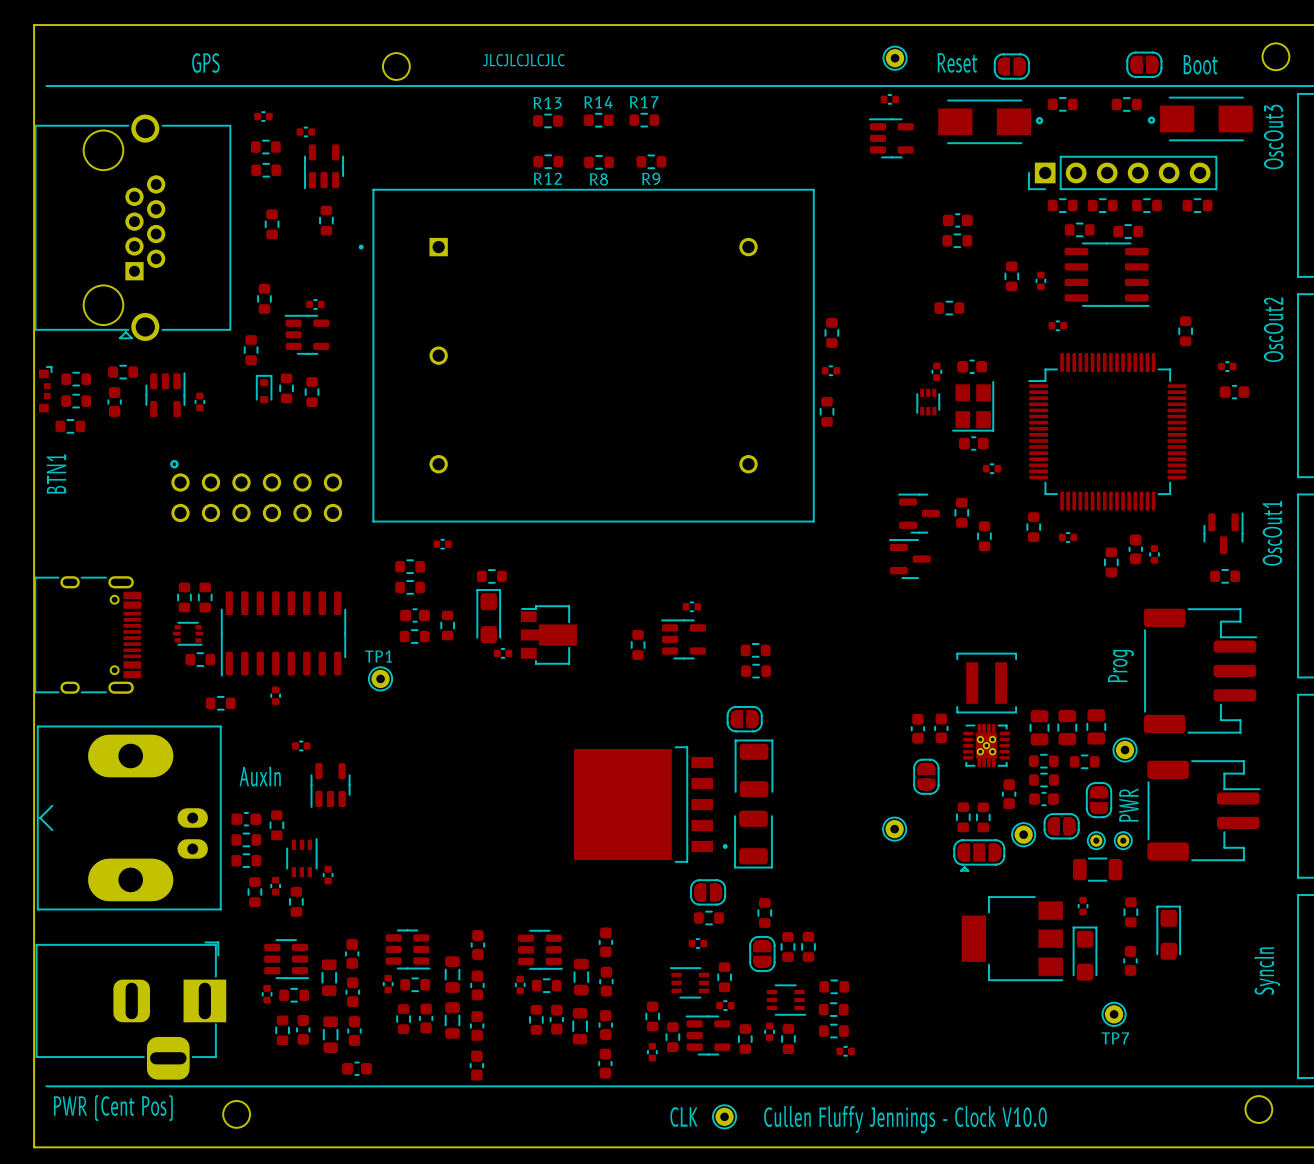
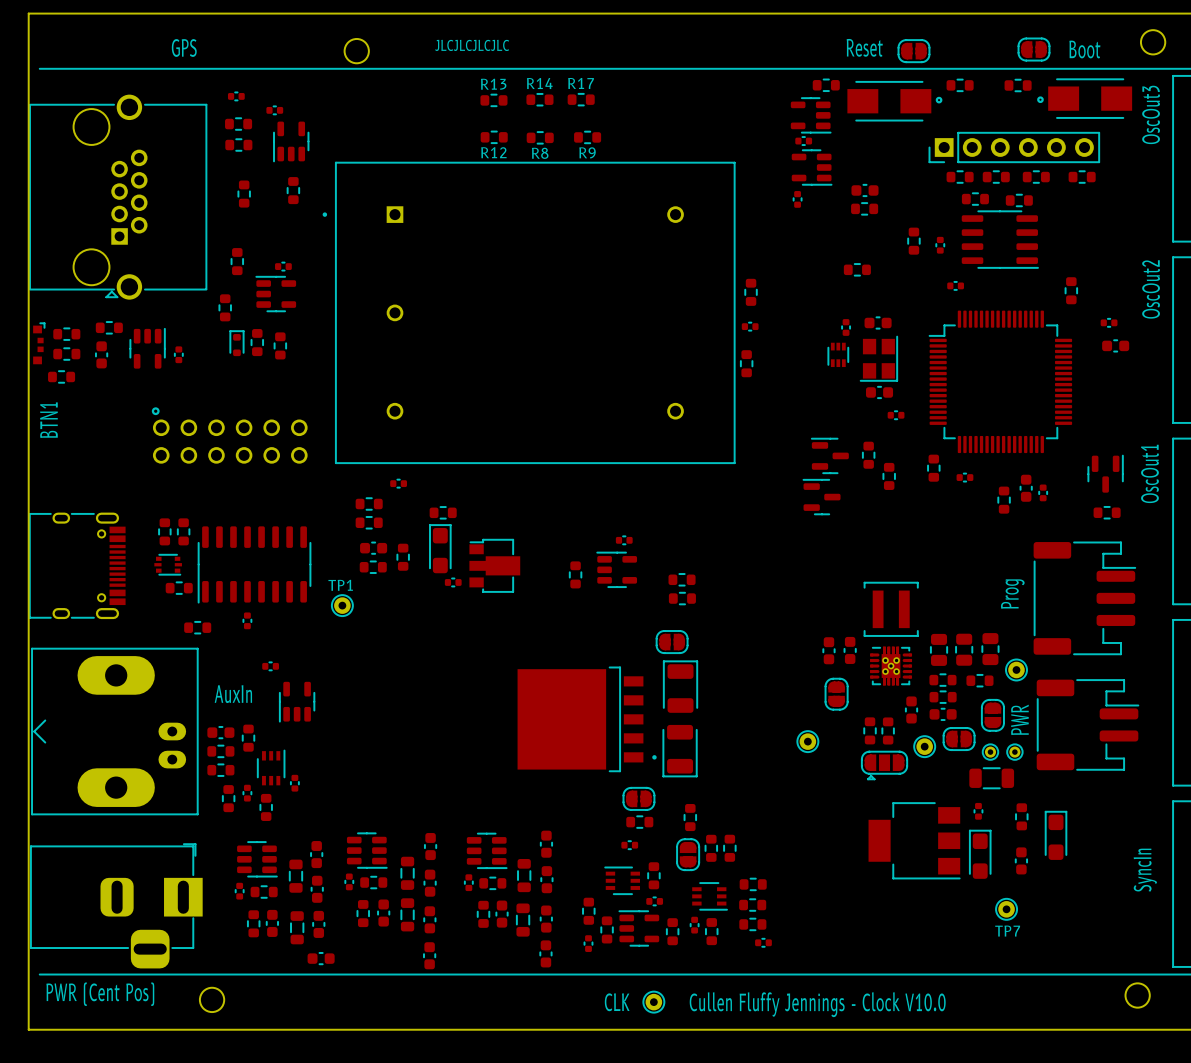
part: (895, 58) -> none
part: (889, 99) -> none
part: none -> (826, 85)
part rotation: 0° (891, 138) -> 180° (811, 115)
part: none -> (803, 141)
part: none -> (811, 167)
part: none -> (797, 199)

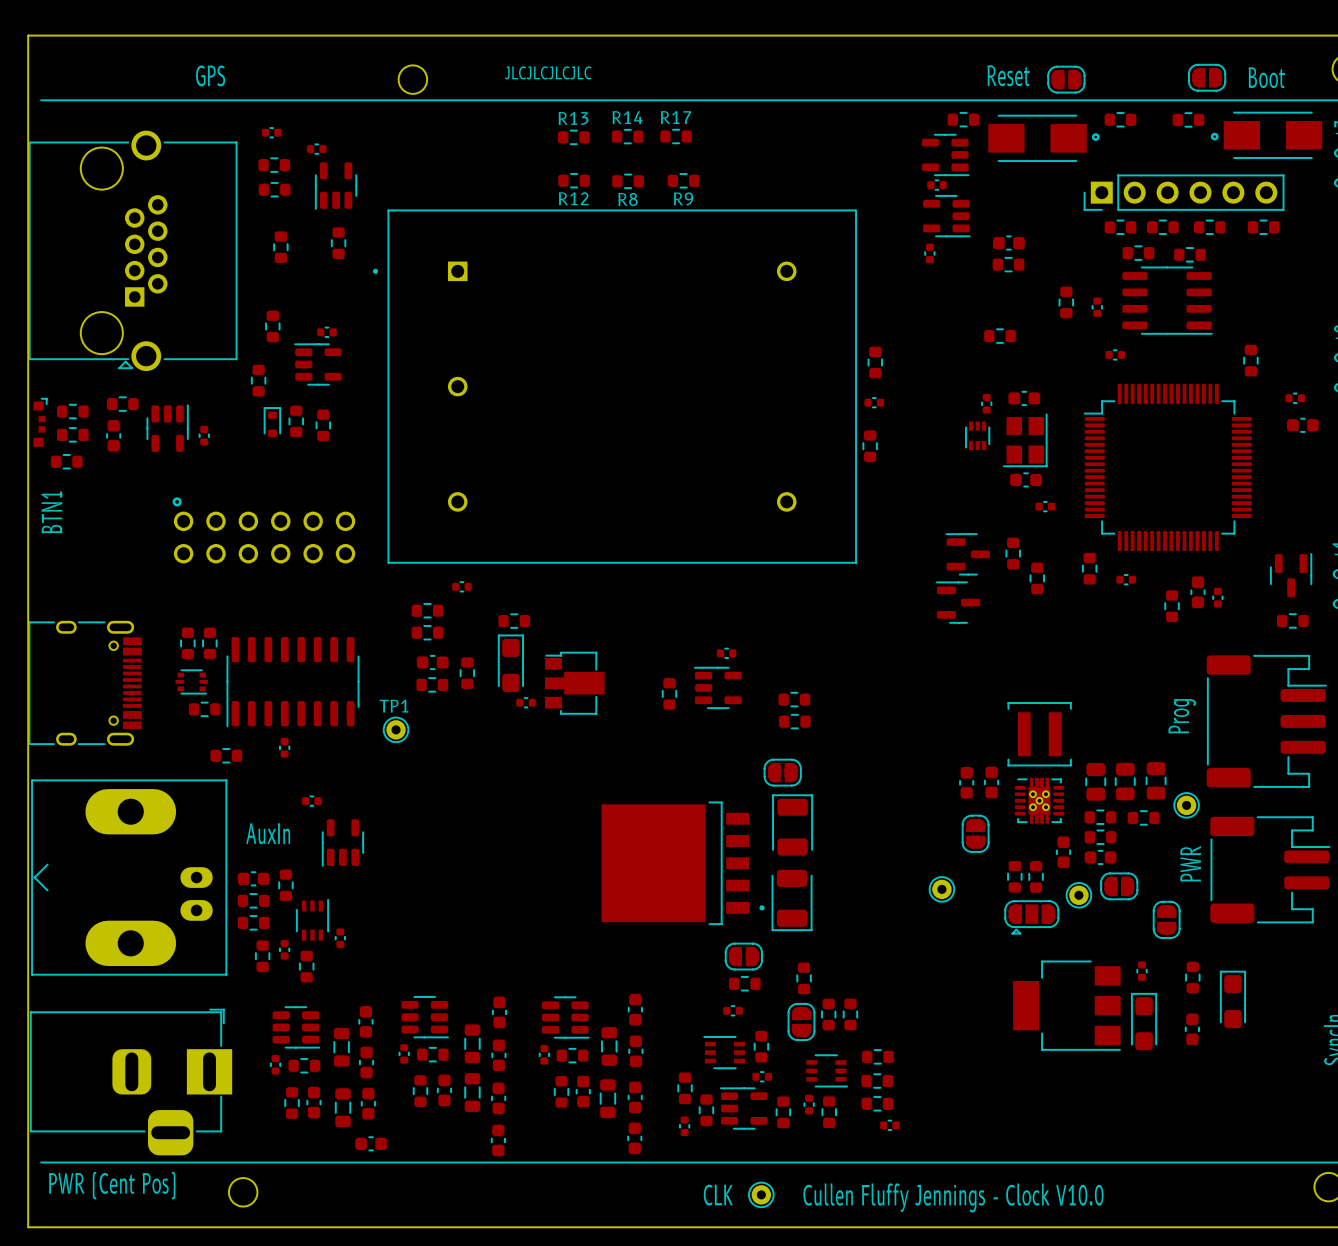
part position: (992, 715) -> (1166, 919)
part: (990, 752) -> none
part: (1014, 752) -> none
part: (991, 778) -> none
TP7: (1006, 909) -> none

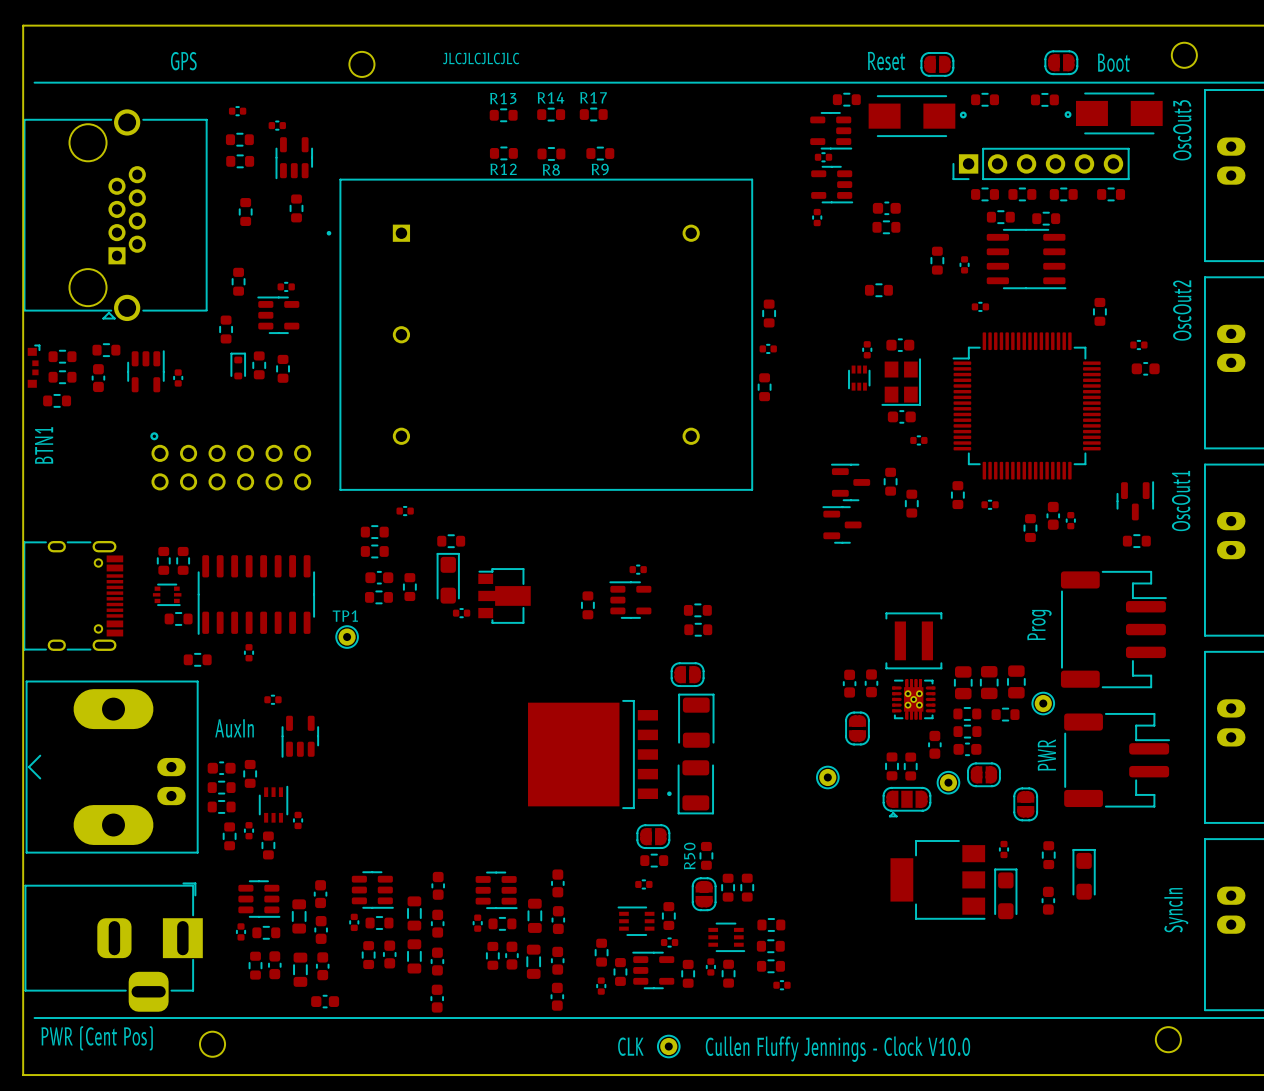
R50 name: none -> R50 (689, 856)

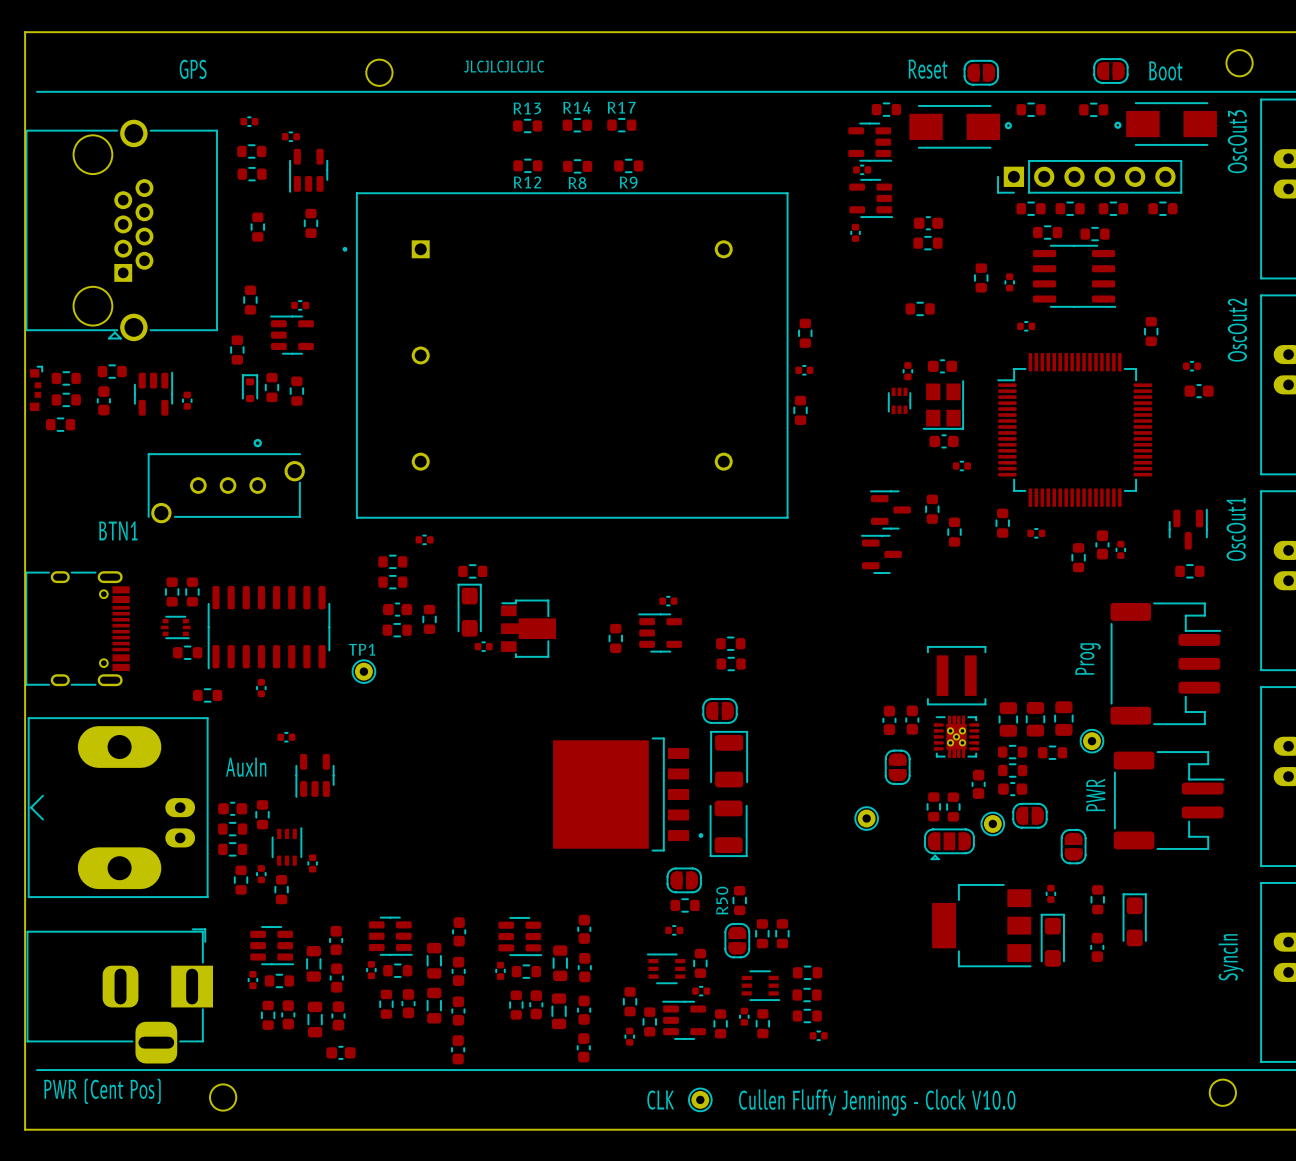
text rotation: 0° (44, 445) -> 90° clockwise (118, 530)
text position: BTN1 (44, 445) -> BTN1 (118, 530)
part: none -> (226, 481)
part: (230, 461) -> none

